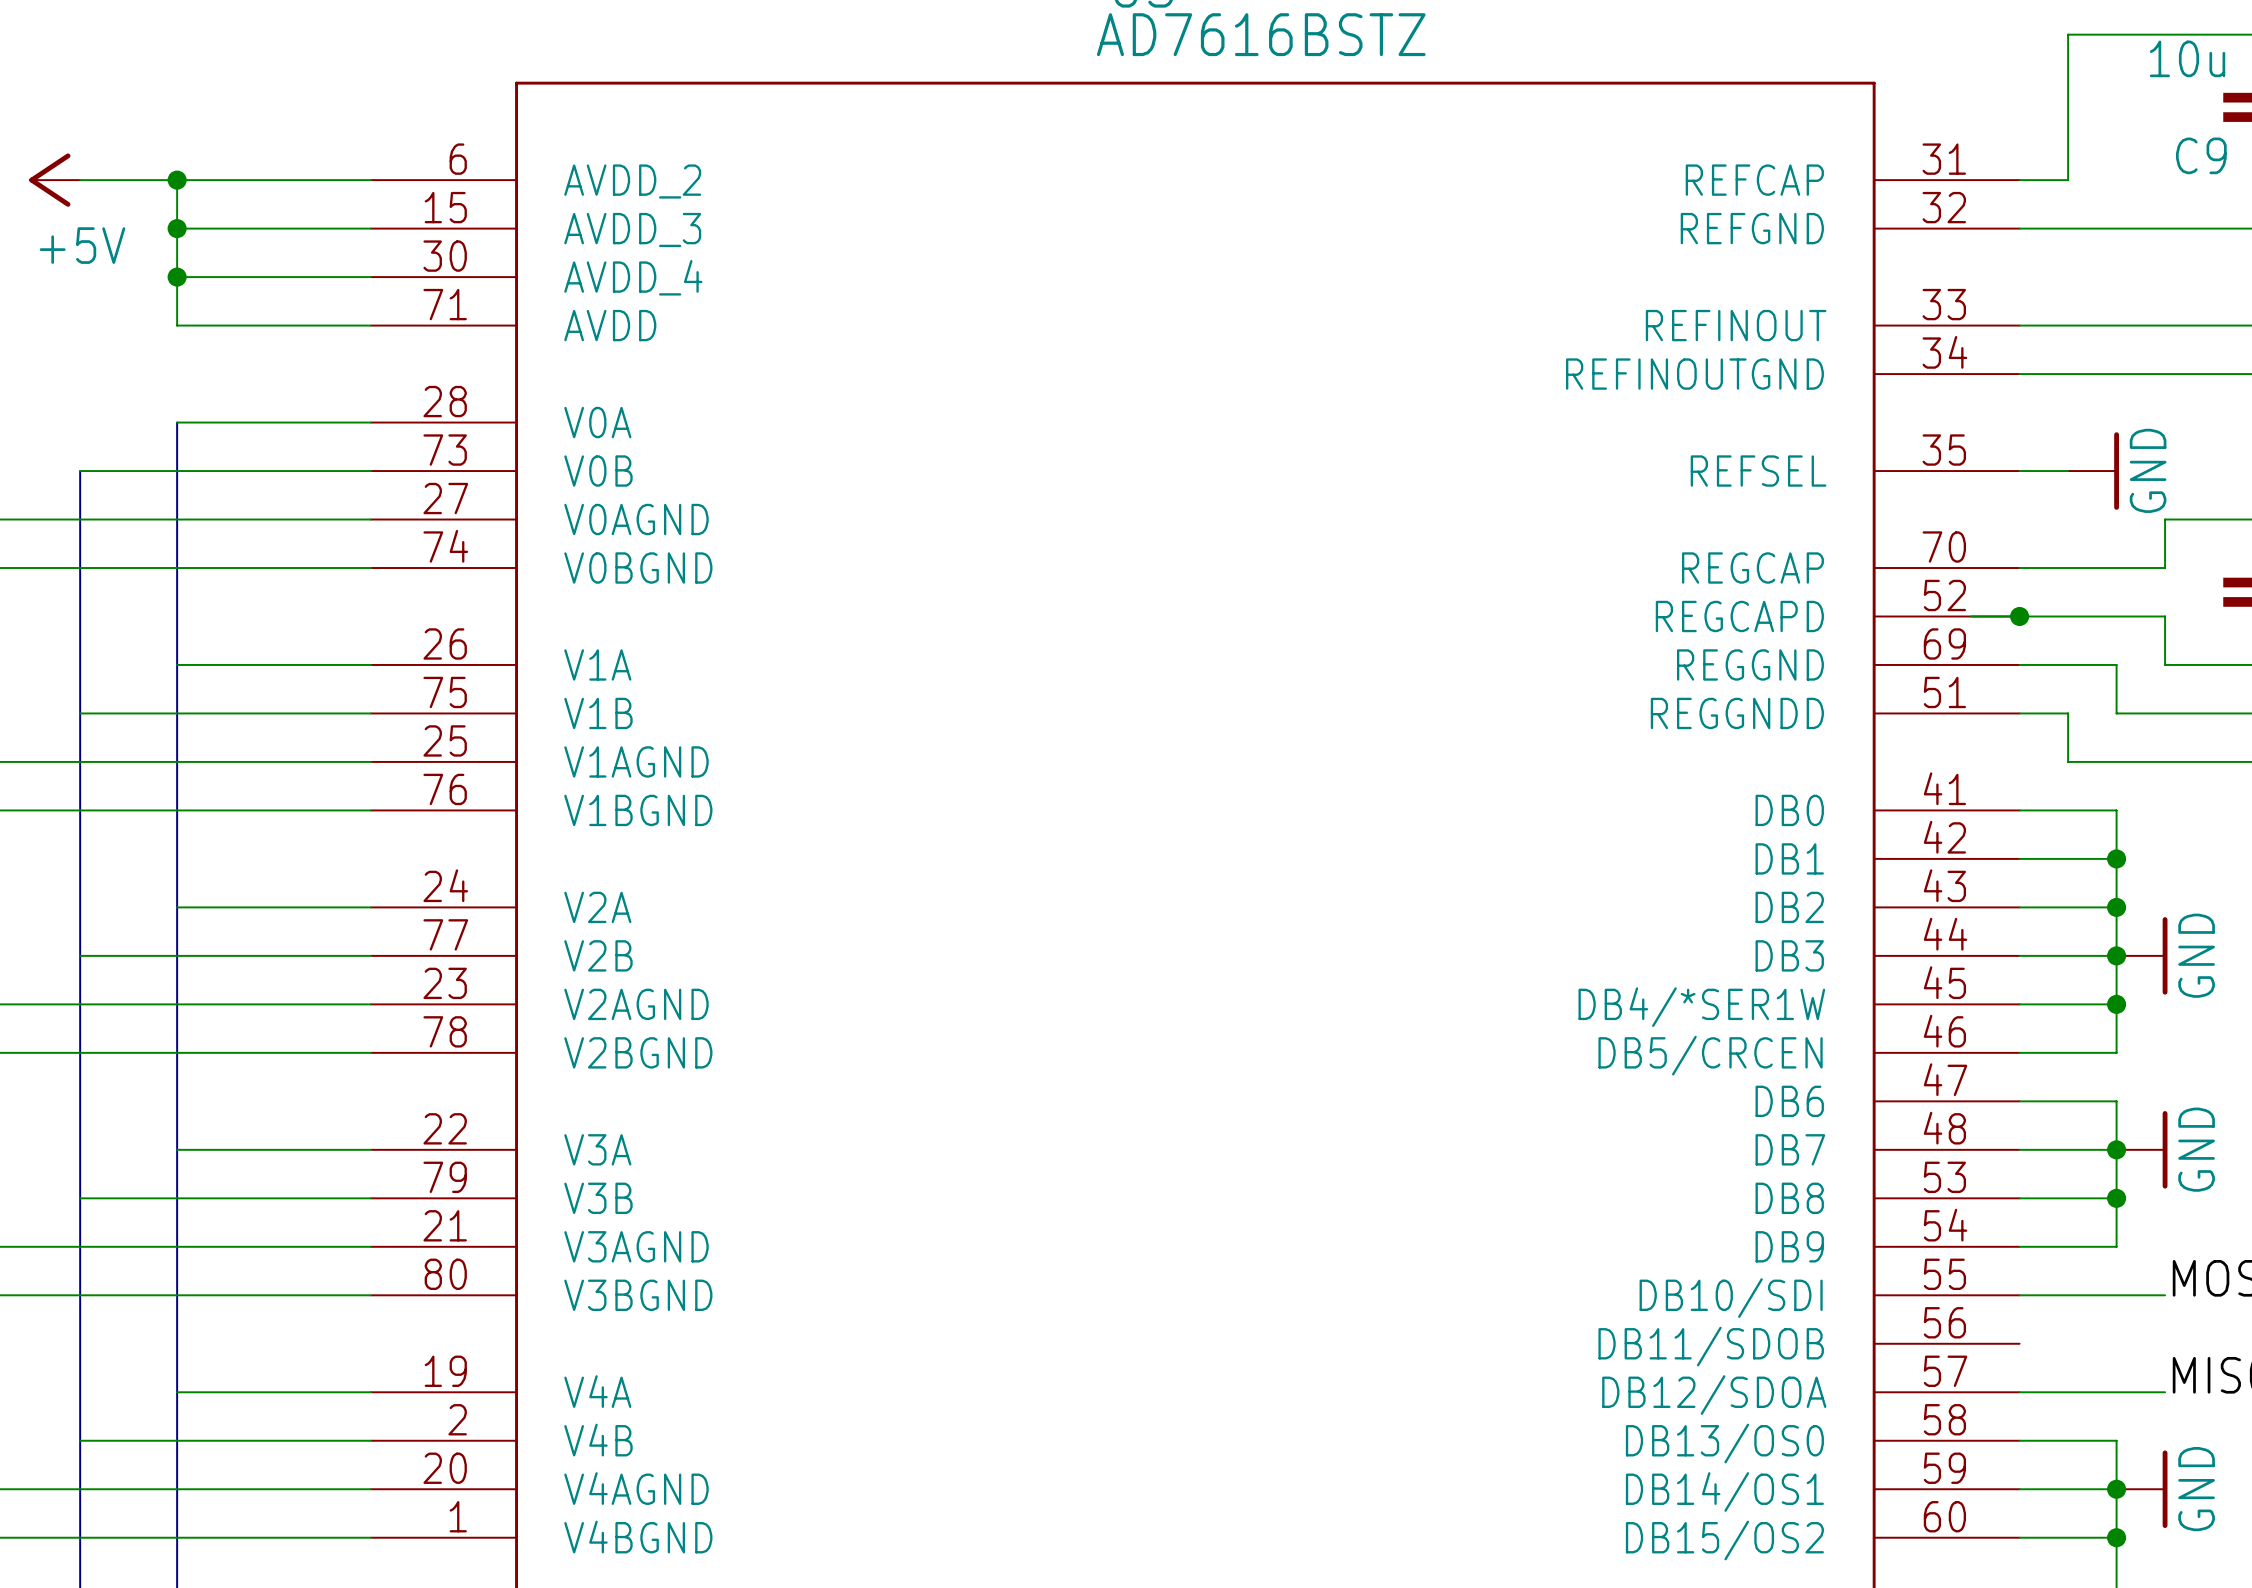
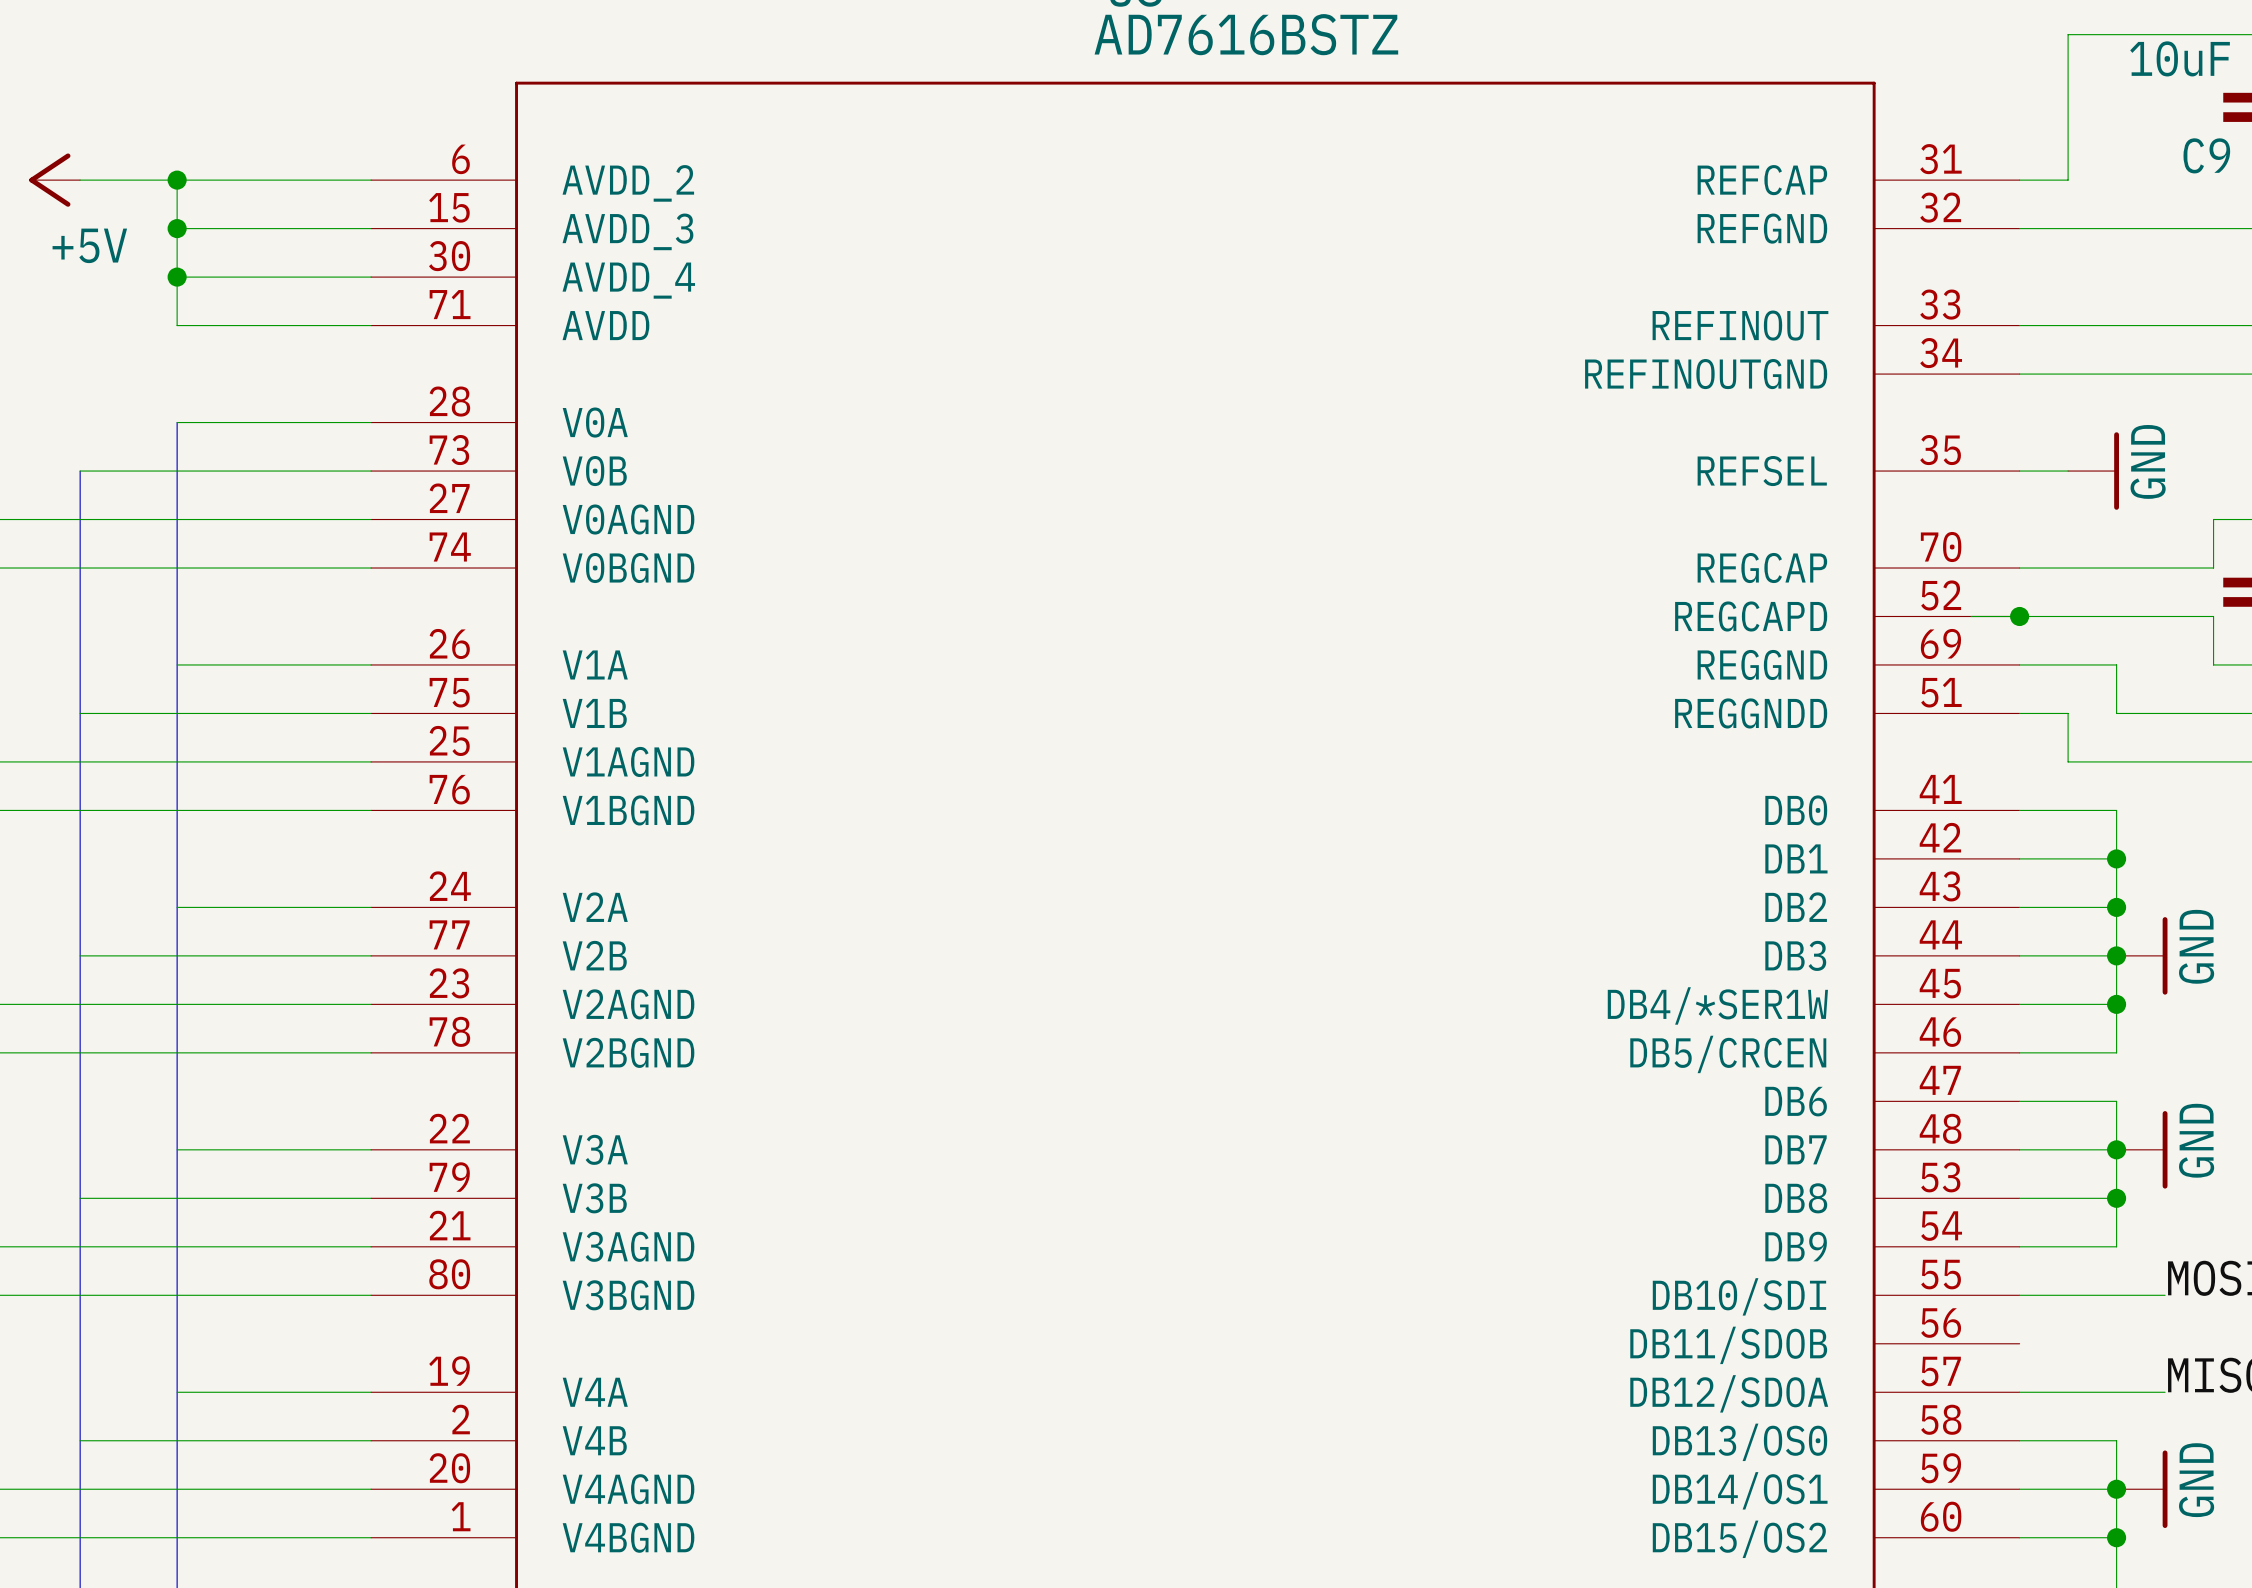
C9 value: 10u (2187, 58) -> 10uF (2180, 58)
wire: (2213, 519) (2165, 519) (2165, 568) -> (2213, 519) (2213, 568) (2165, 568)
wire: (2165, 616) (2165, 664) (2213, 664) -> (2165, 616) (2213, 616) (2213, 664)

